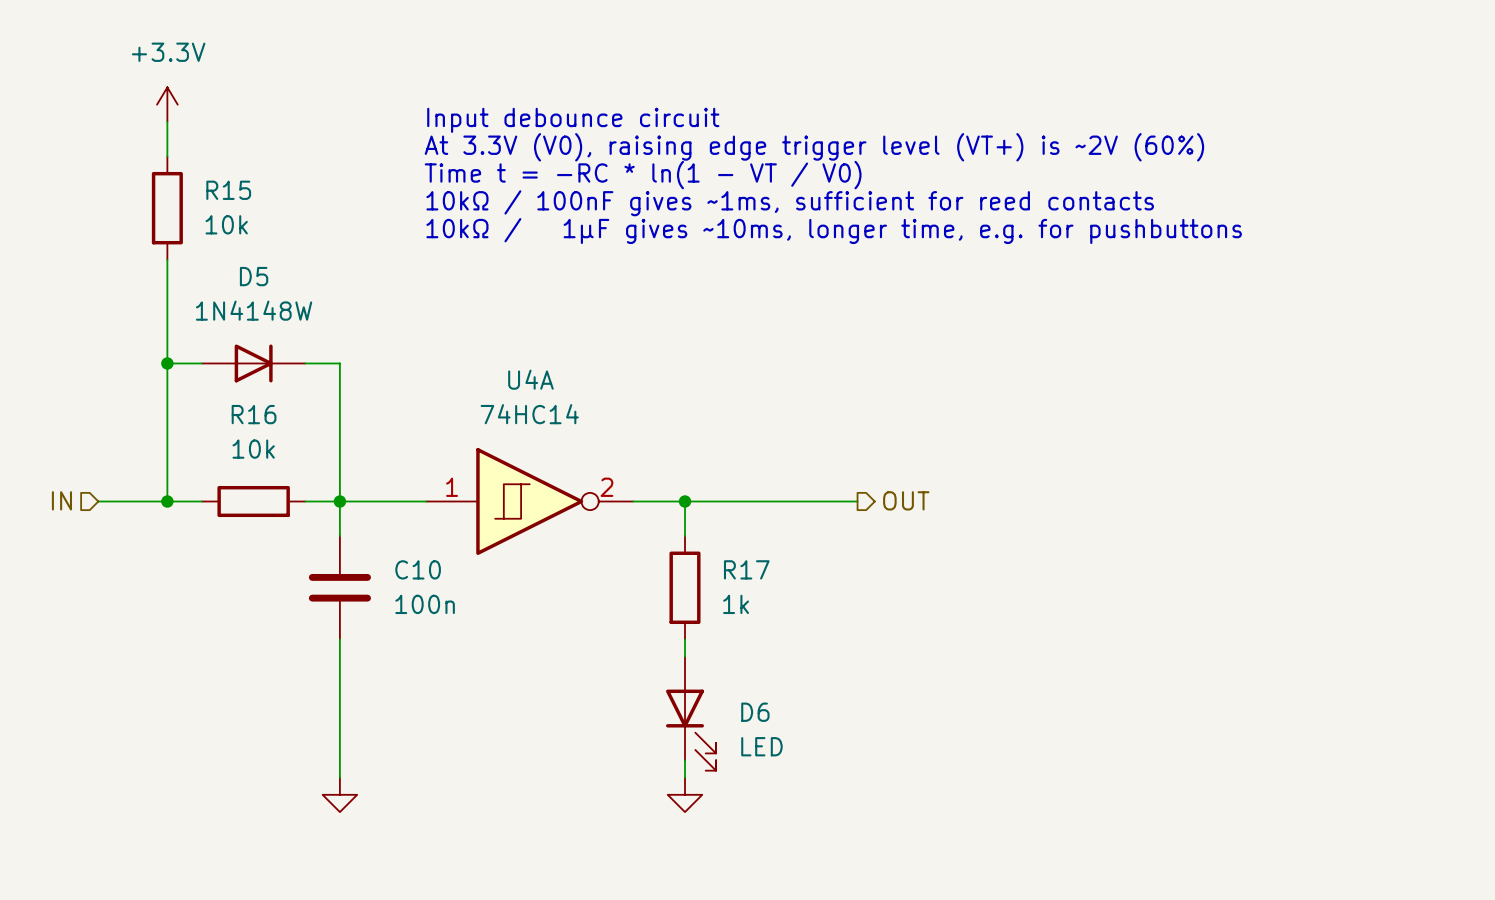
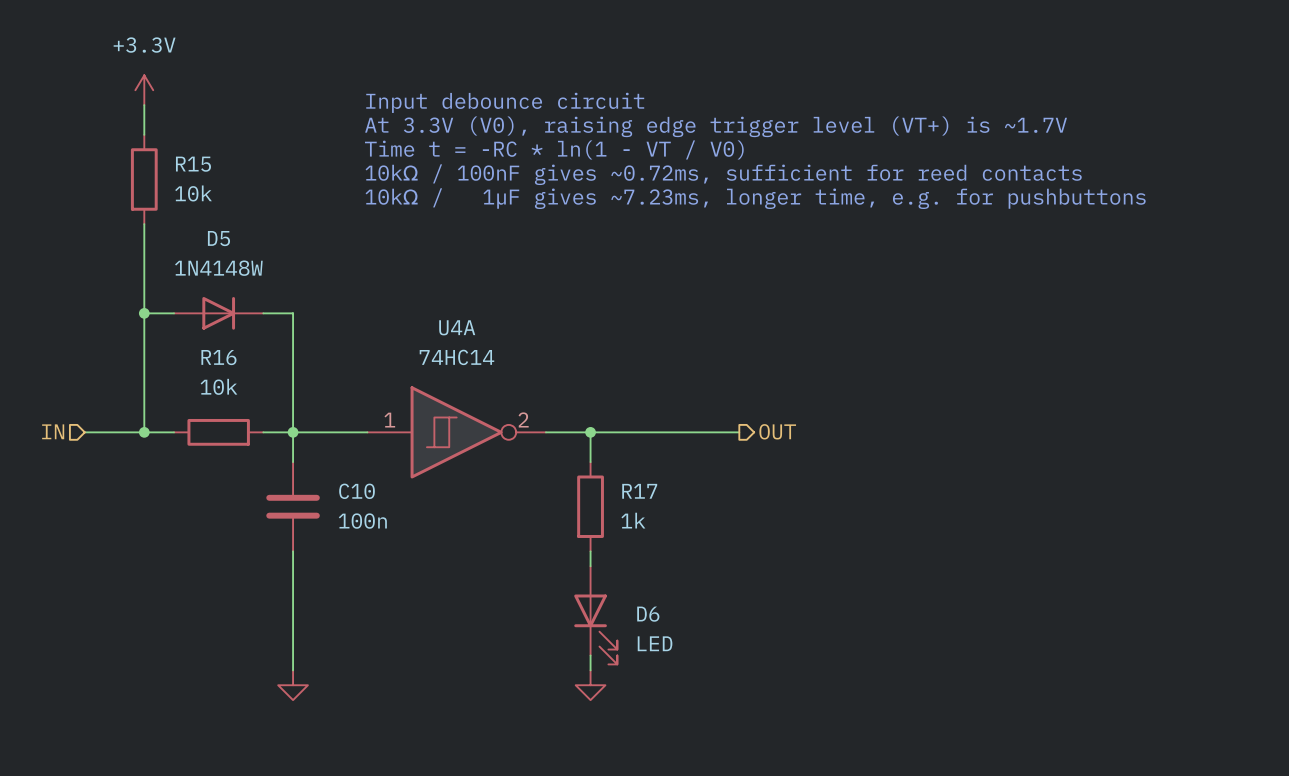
text: At 3.3V (V0), raising edge trigger level (VT+) is ~2V (60%) (814, 147) -> At 3.3V (V0), raising edge trigger level (VT+) is ~1.7V (716, 126)
text: 10kΩ / 100nF gives ~1ms, sufficient for reed contacts (790, 203) -> 10kΩ / 100nF gives ~0.72ms, sufficient for reed contacts (723, 174)
text: 10kΩ / 1µF gives ~10ms, longer time, e.g. for pushbuttons (834, 231) -> 10kΩ / 1µF gives ~7.23ms, longer time, e.g. for pushbuttons (755, 198)

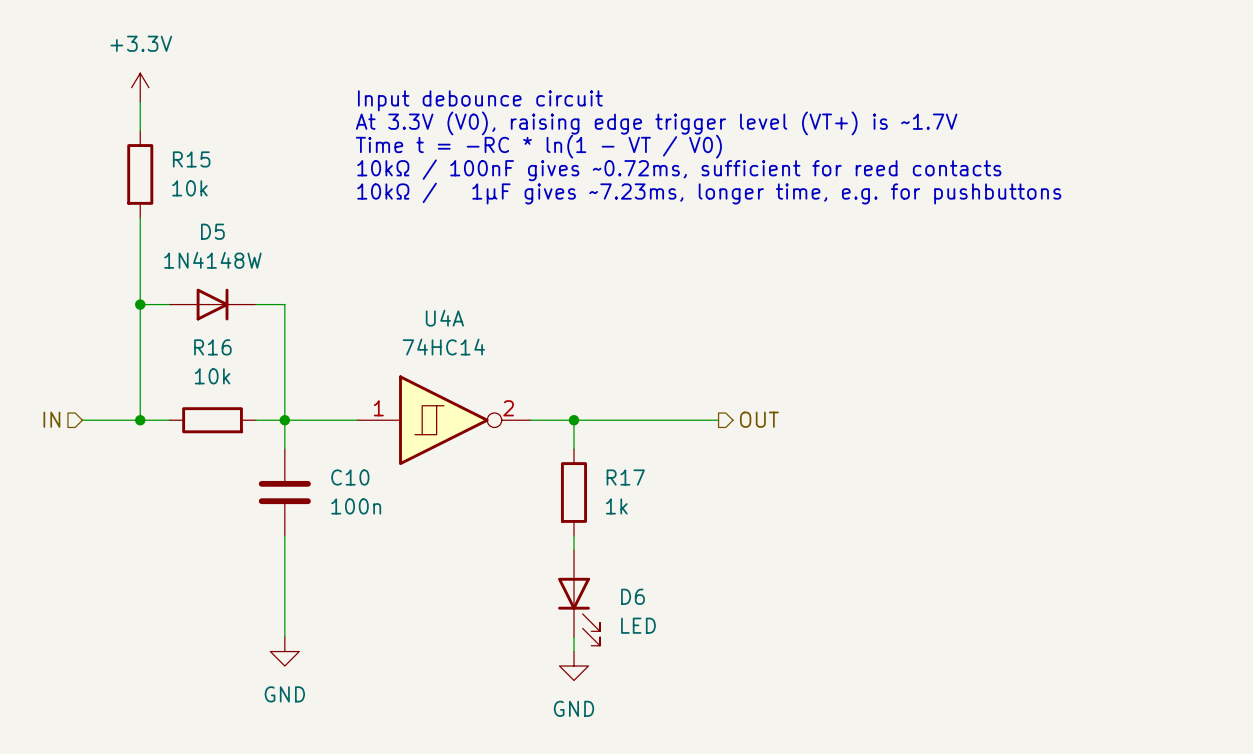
power symbol: none -> GND (284, 651)
power symbol: (293, 685) -> none
power symbol text: none -> GND (573, 708)

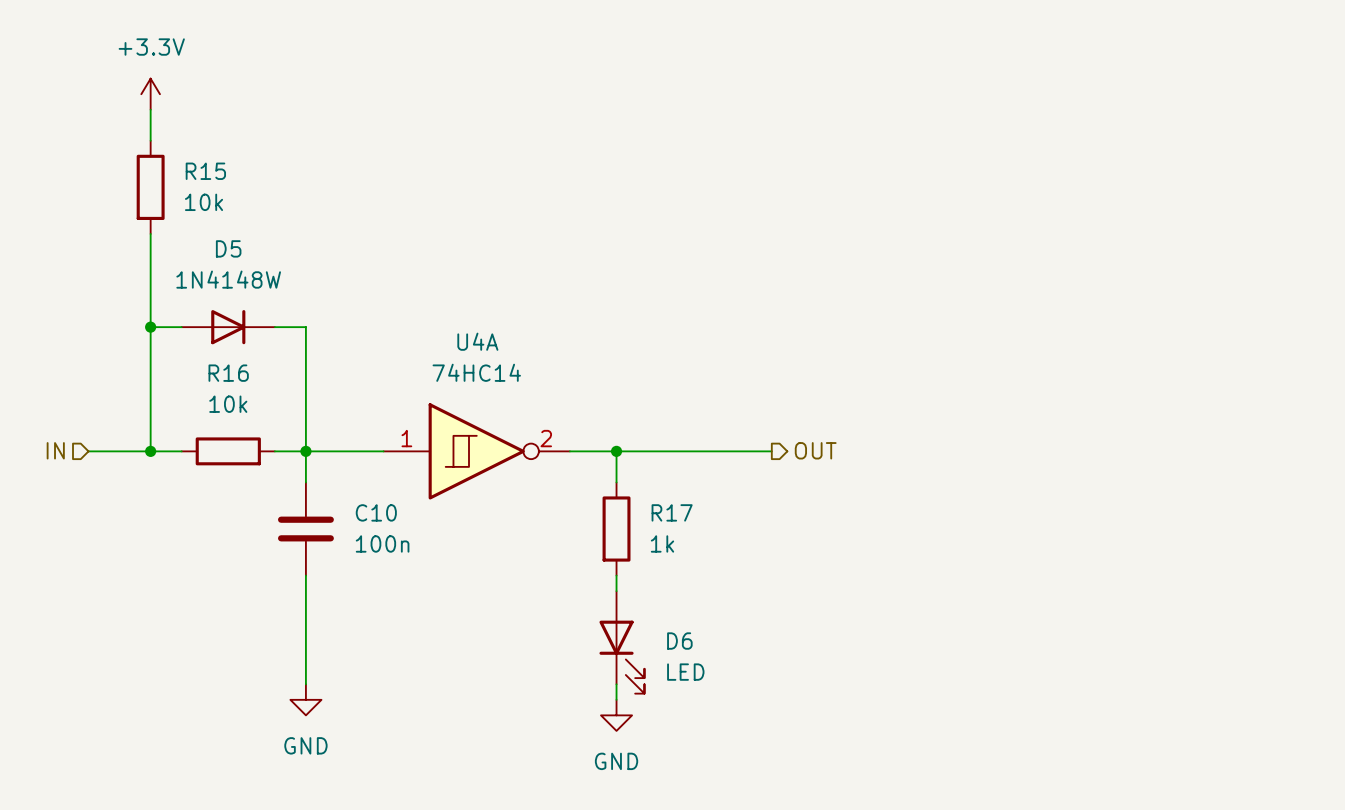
text: Input debounce circuit (480, 100) -> none
text: At 3.3V (V0), raising edge trigger level (VT+) is ~1.7V (656, 123) -> none
text: Time t = -RC * ln(1 - VT / V0) (538, 146) -> none
text: 10kΩ / 100nF gives ~0.72ms, sufficient for reed contacts (679, 170) -> none
text: 10kΩ / 1µF gives ~7.23ms, longer time, e.g. for pushbuttons (709, 193) -> none

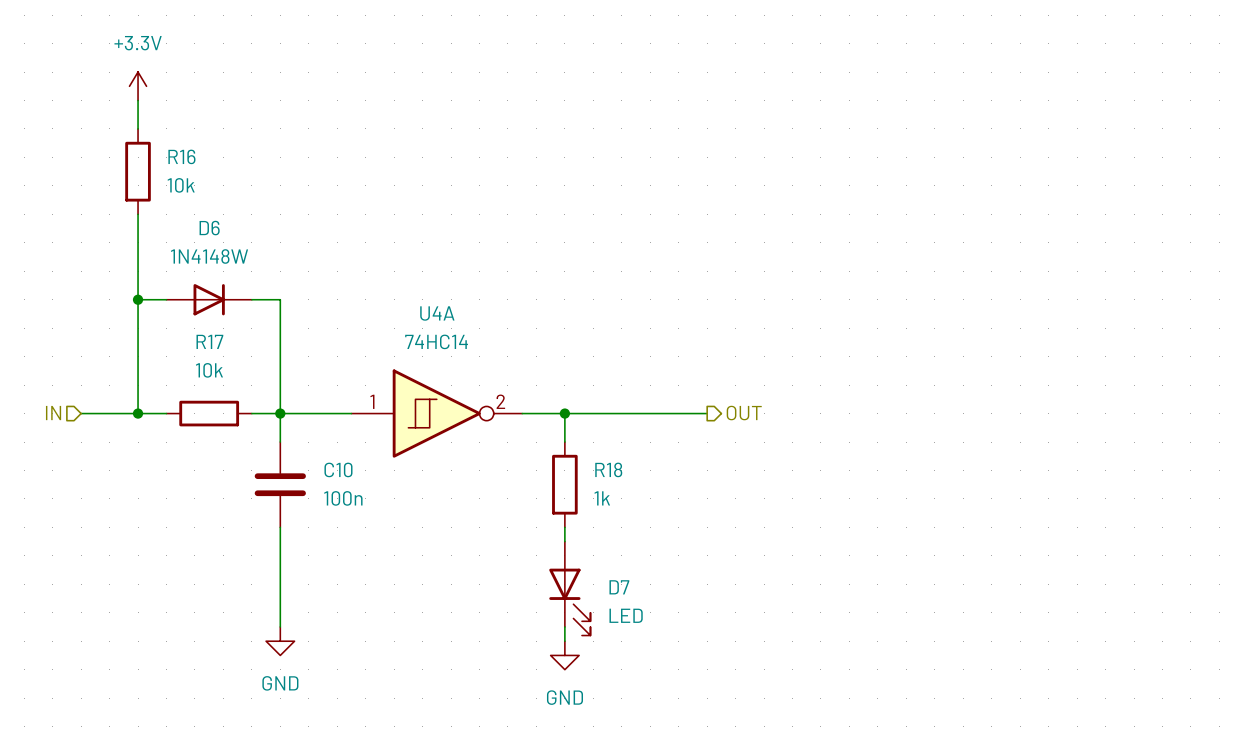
R15 name: R15 (205, 171) -> R16 (181, 156)
D5 name: D5 (228, 248) -> D6 (209, 228)
R16 name: R16 (228, 373) -> R17 (209, 341)
R17 name: R17 (672, 512) -> R18 (608, 469)
D6 name: D6 (679, 641) -> D7 (619, 587)

